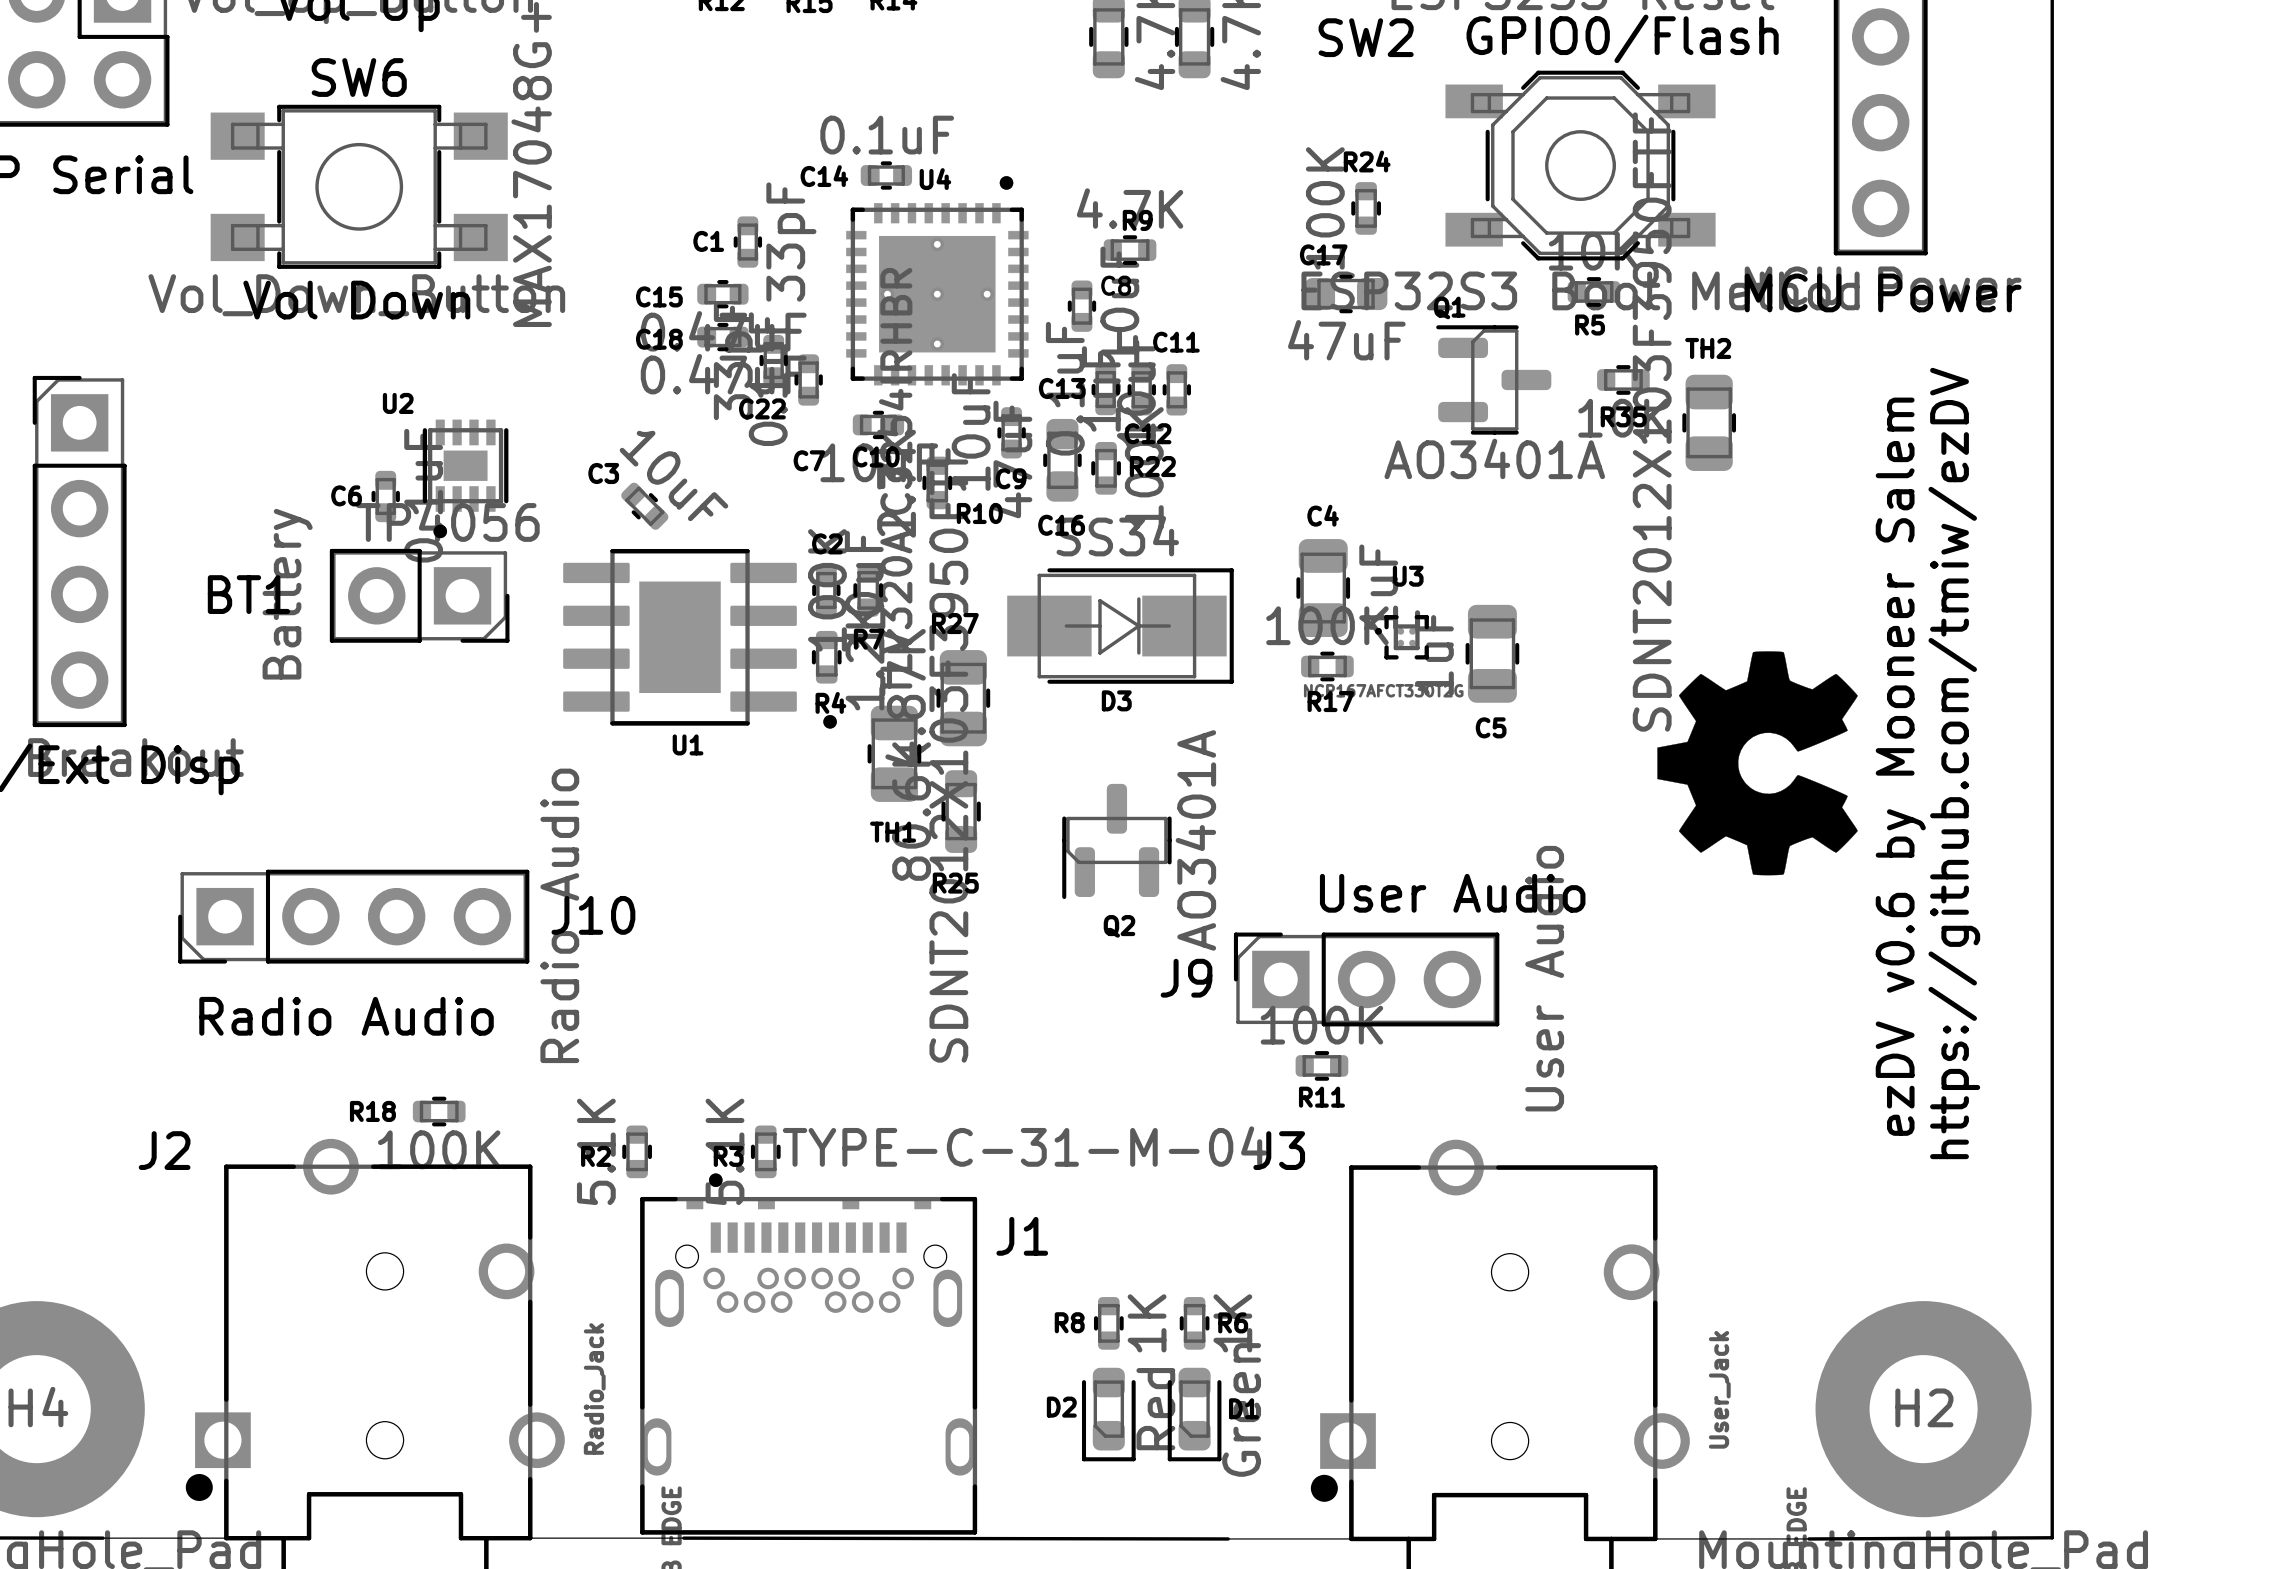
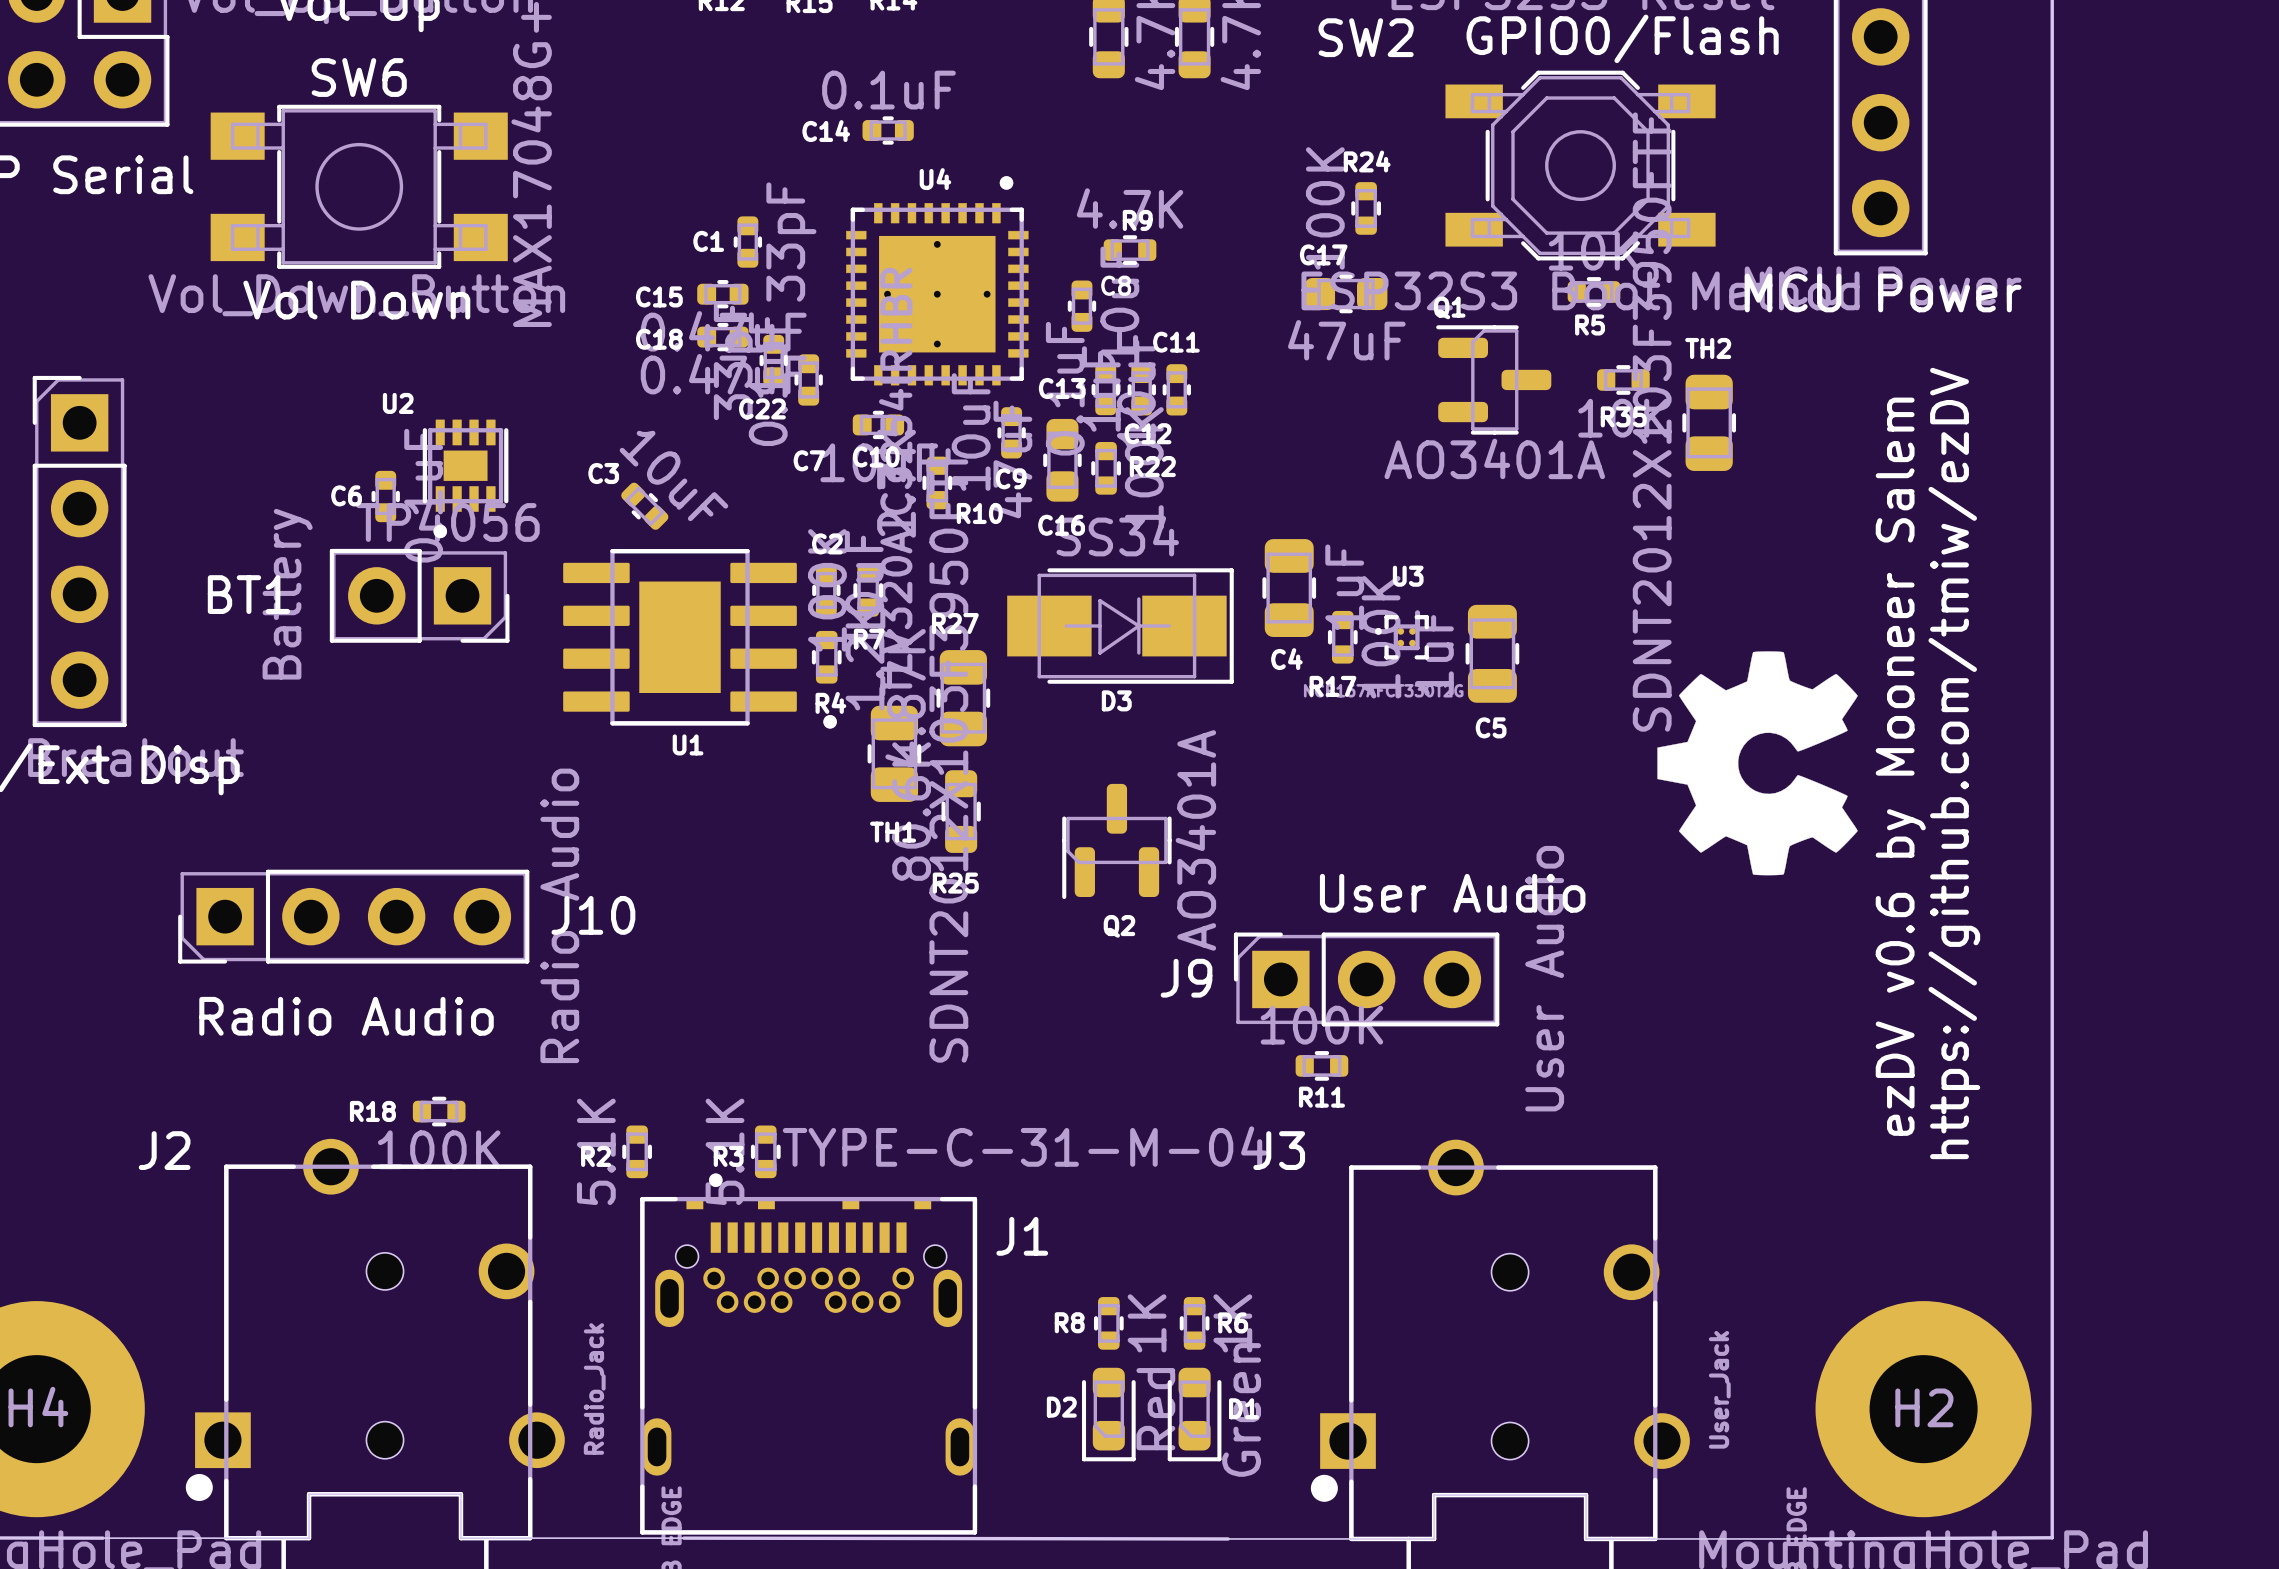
C14 position: (886, 175) -> (888, 130)
C4 name position: C4 (1323, 515) -> C4 (1286, 659)
C4 position: (1323, 588) -> (1289, 588)
R17 rotation: 0° (1327, 666) -> 90° clockwise (1342, 637)
R17 position: (1327, 666) -> (1342, 637)

